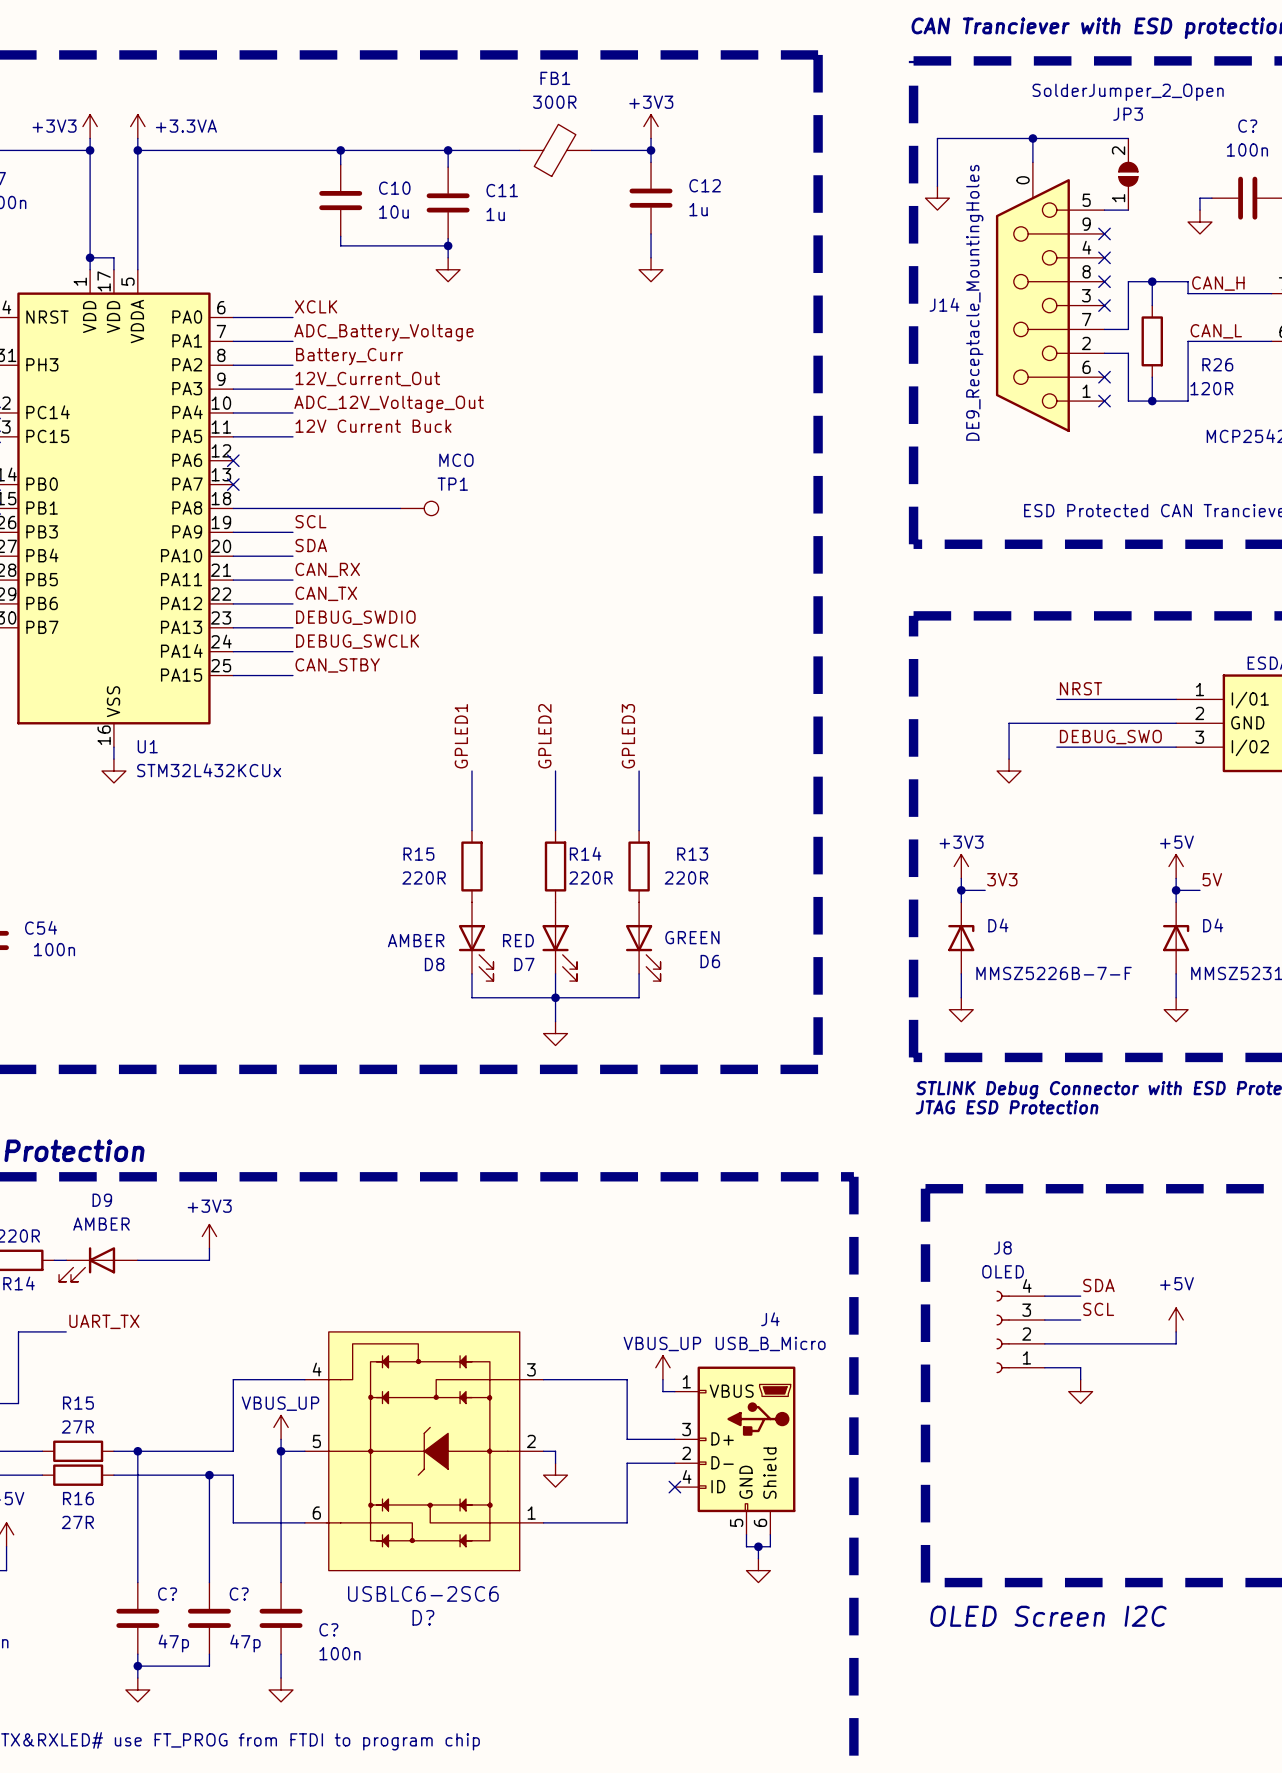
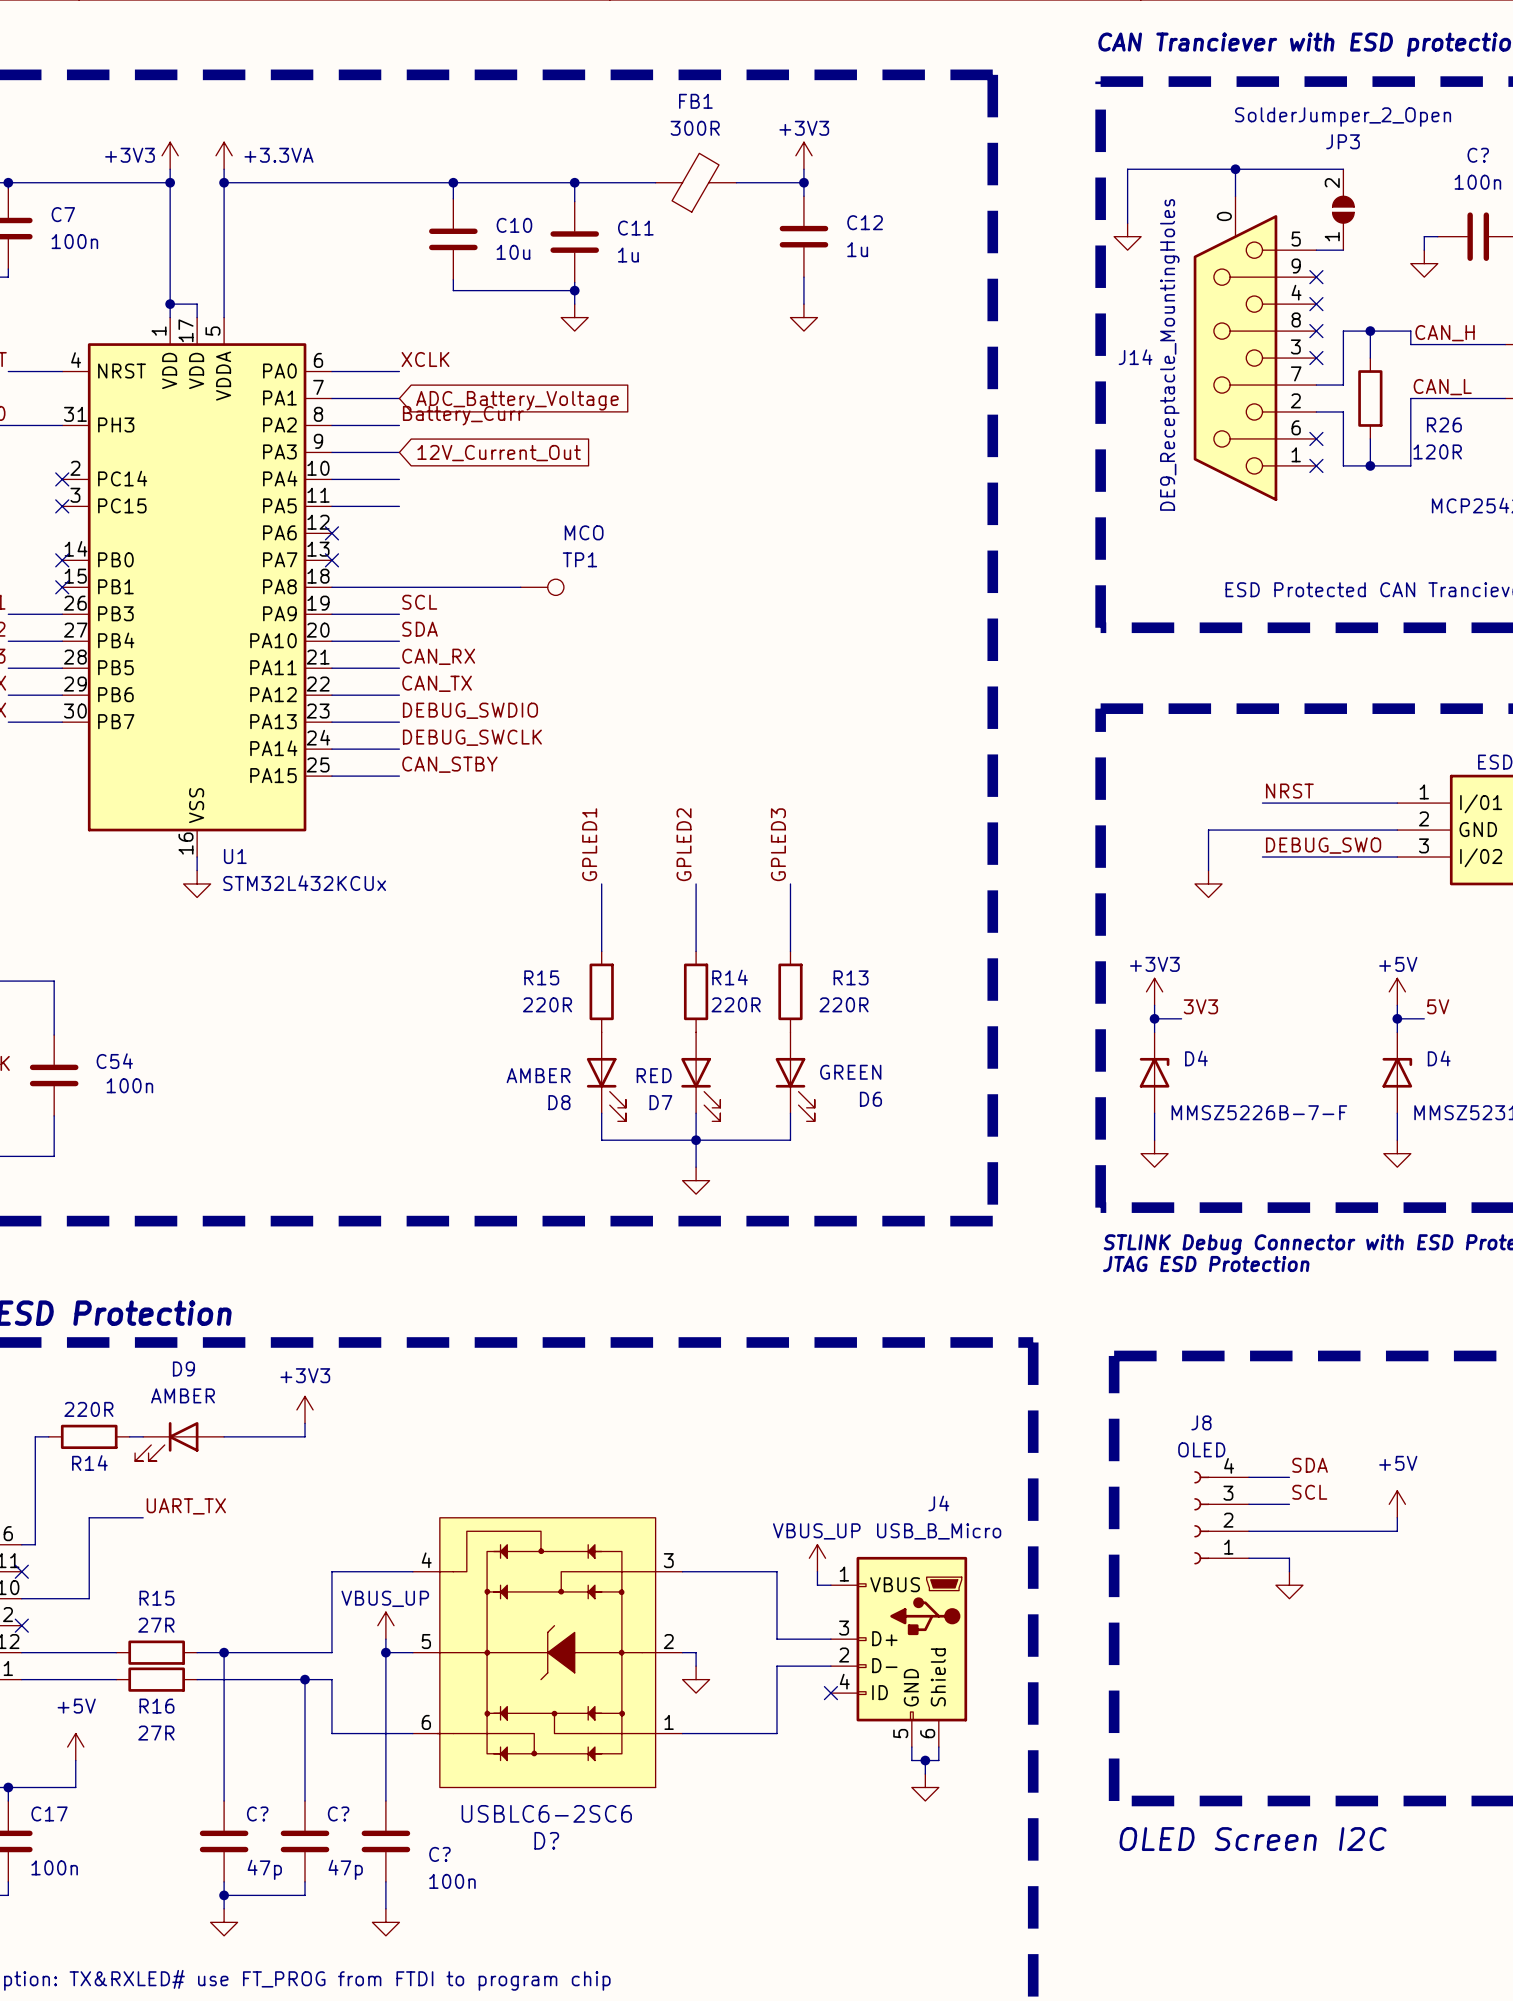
label: ADC_Battery_Voltage (383, 332) -> none
global label: none -> ADC_Battery_Voltage (517, 400)
label: 12V_Current_Out (367, 379) -> none
global label: none -> 12V_Current_Out (499, 453)
label: ADC_12V_Voltage_Out (389, 404) -> none
label: 12V Current Buck (373, 426) -> none

